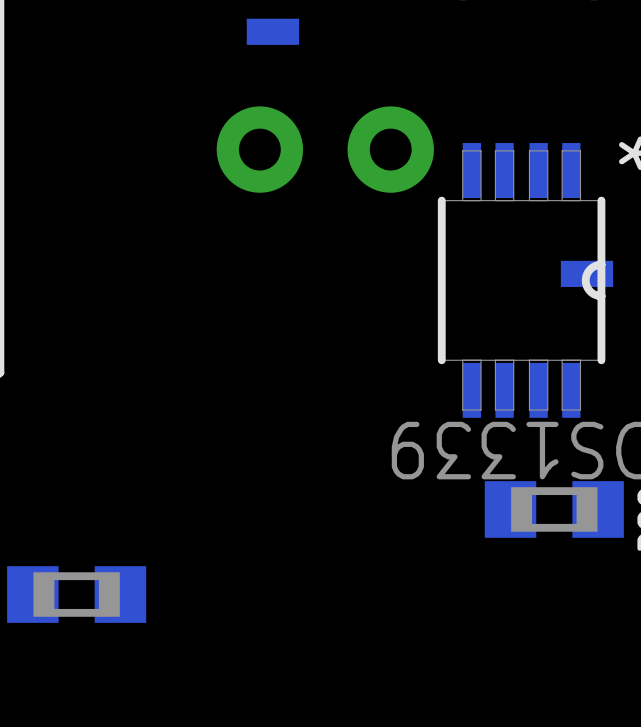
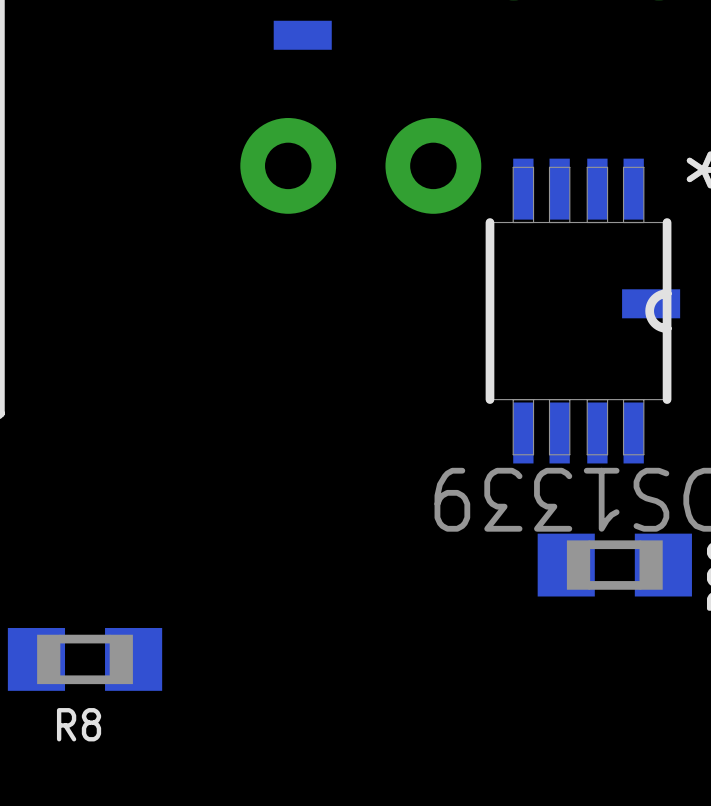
R8 name: none -> R8 (79, 724)

